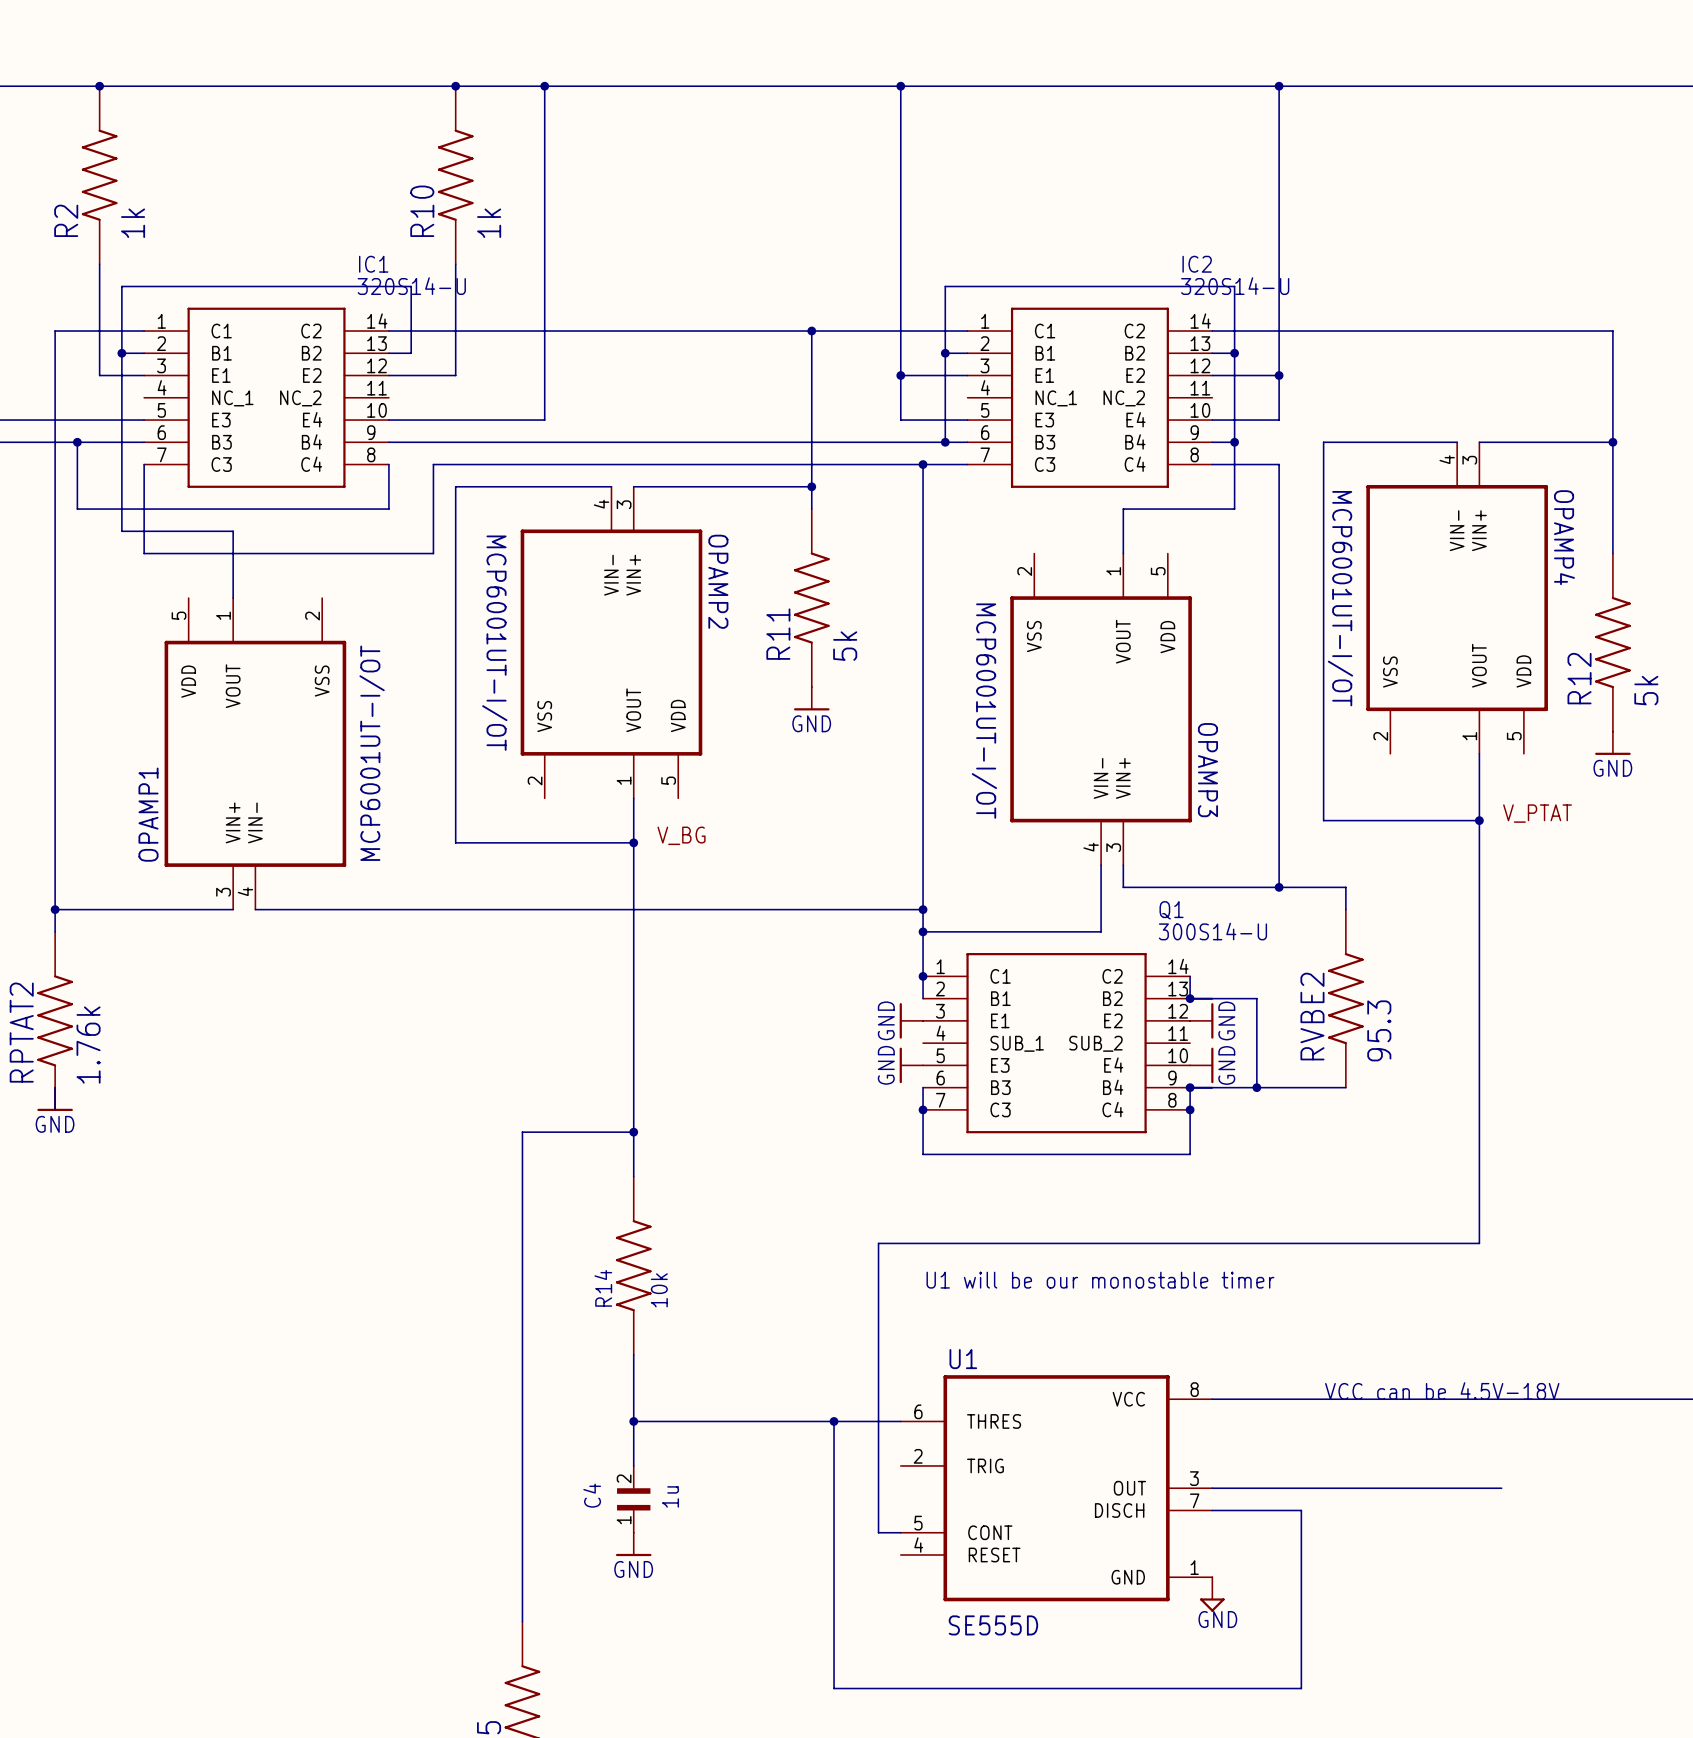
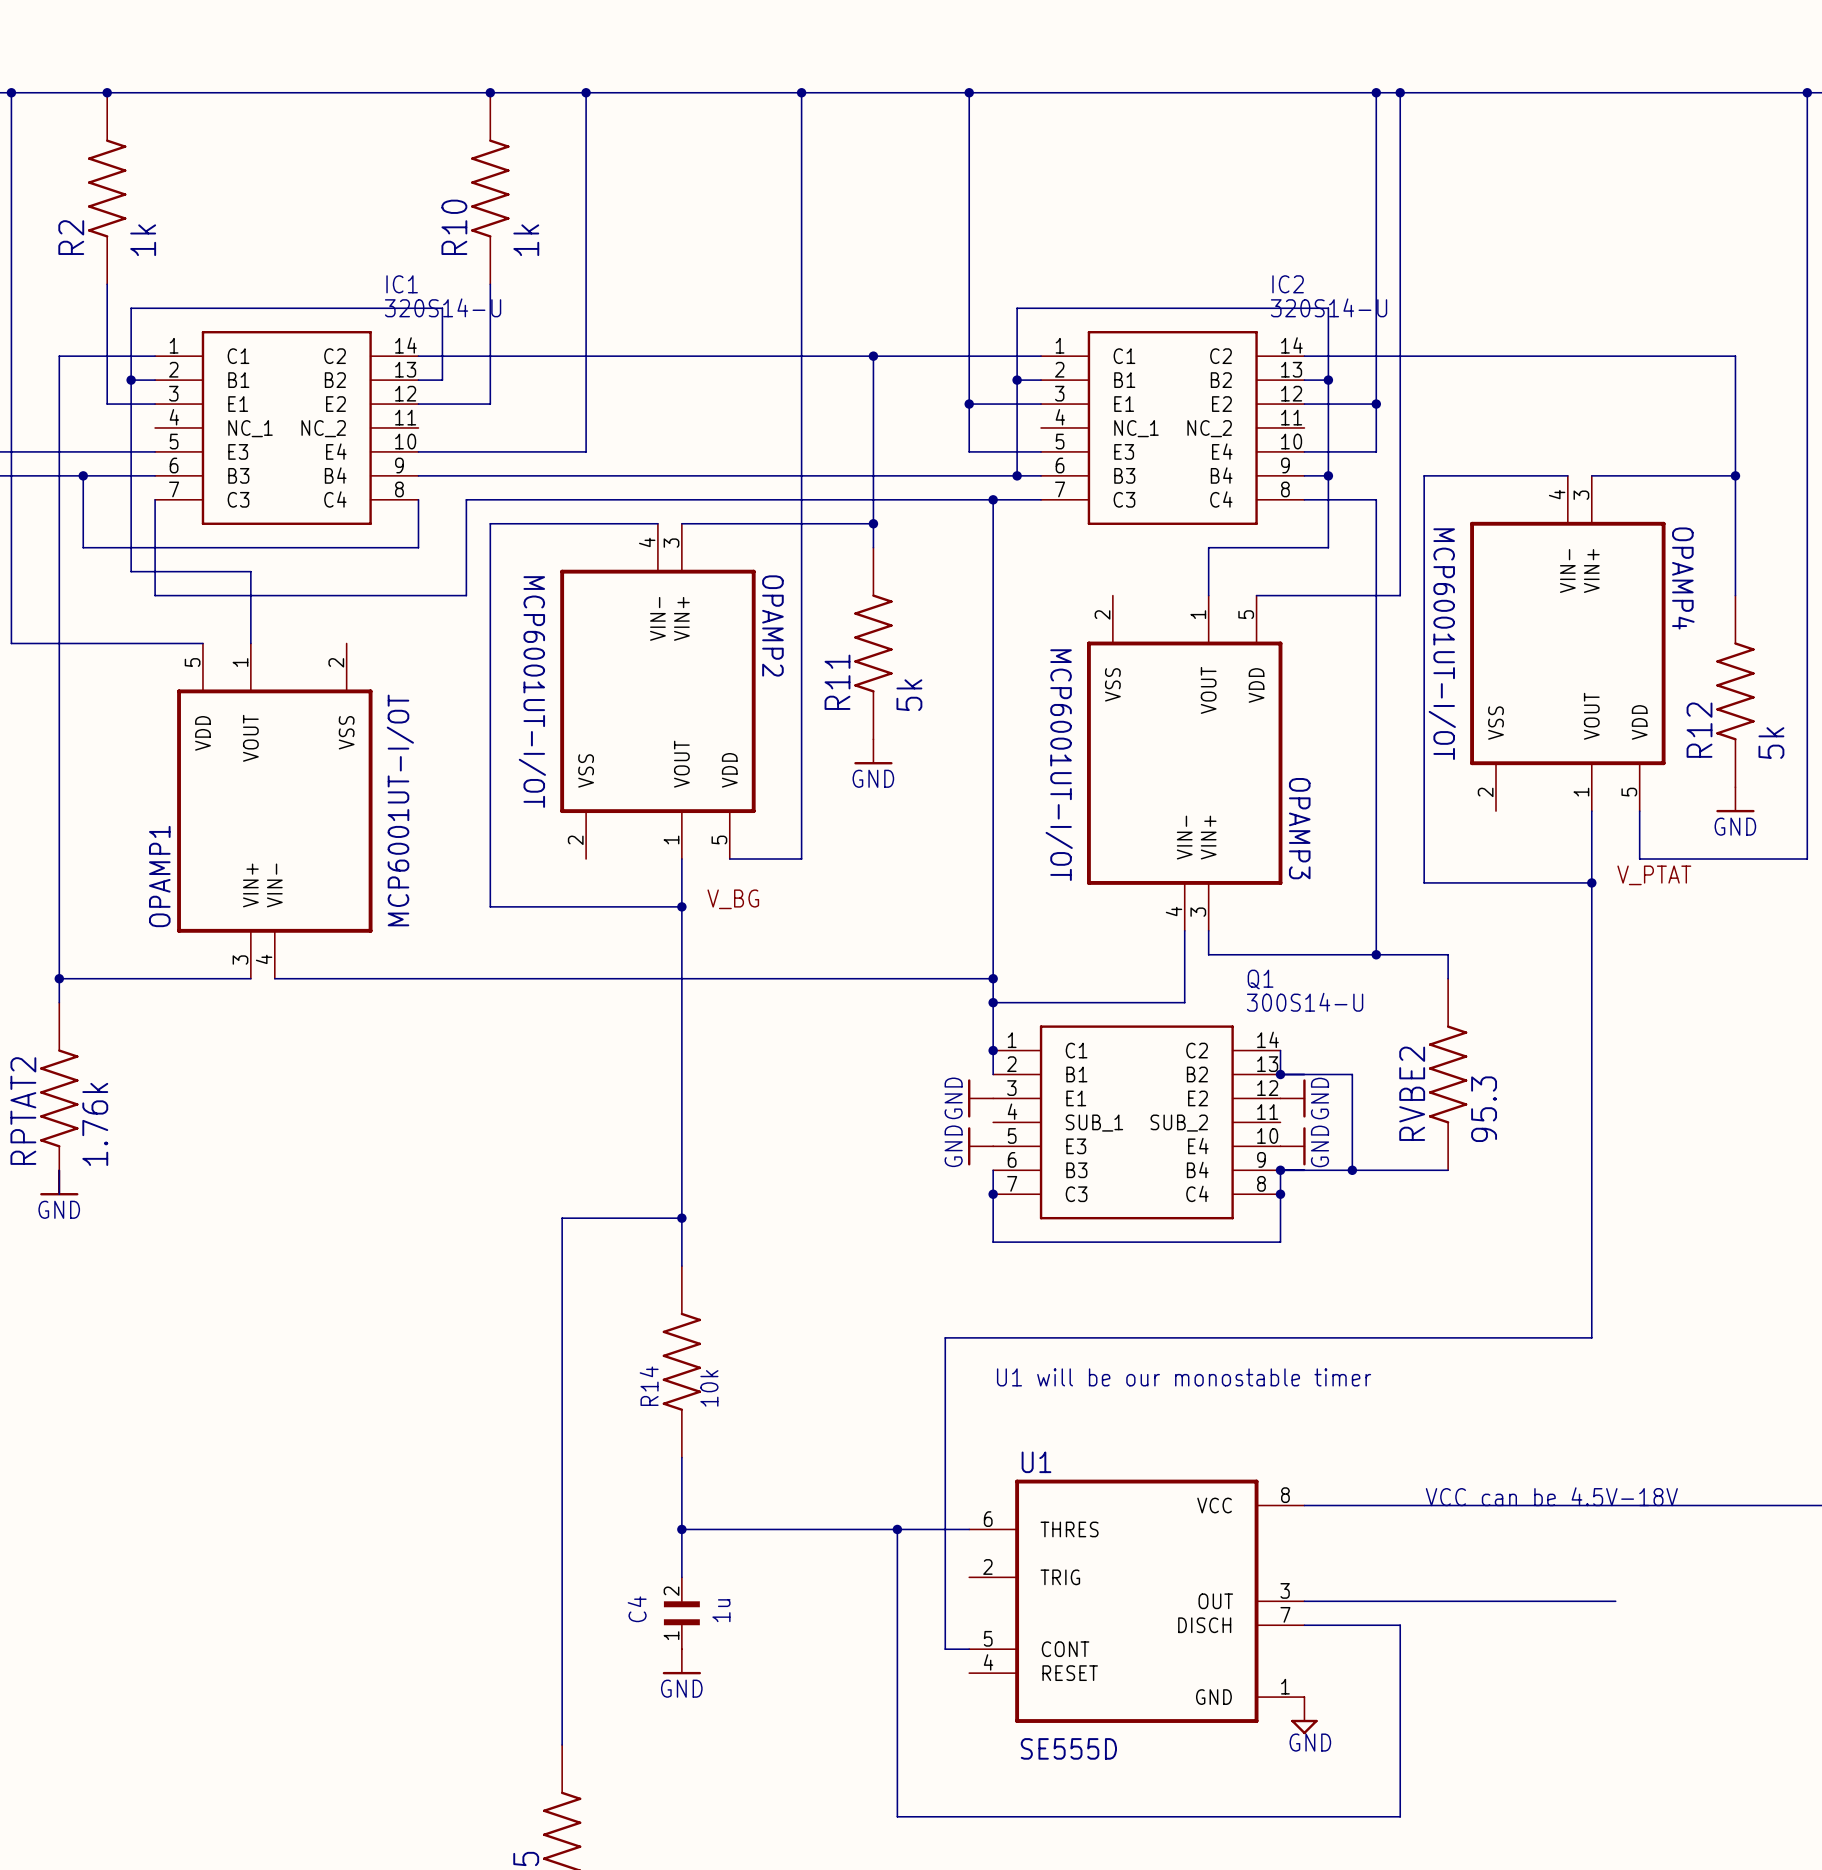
wire: none -> (11, 92) (11, 643) (202, 643)
junction: none -> (11, 92)
wire: none -> (801, 92) (801, 859) (729, 859)
junction: none -> (801, 92)
wire: none -> (1400, 92) (1400, 595) (1256, 595)
junction: none -> (1400, 92)
wire: none -> (1807, 92) (1807, 859) (1639, 859) (1639, 811)
junction: none -> (1807, 92)

